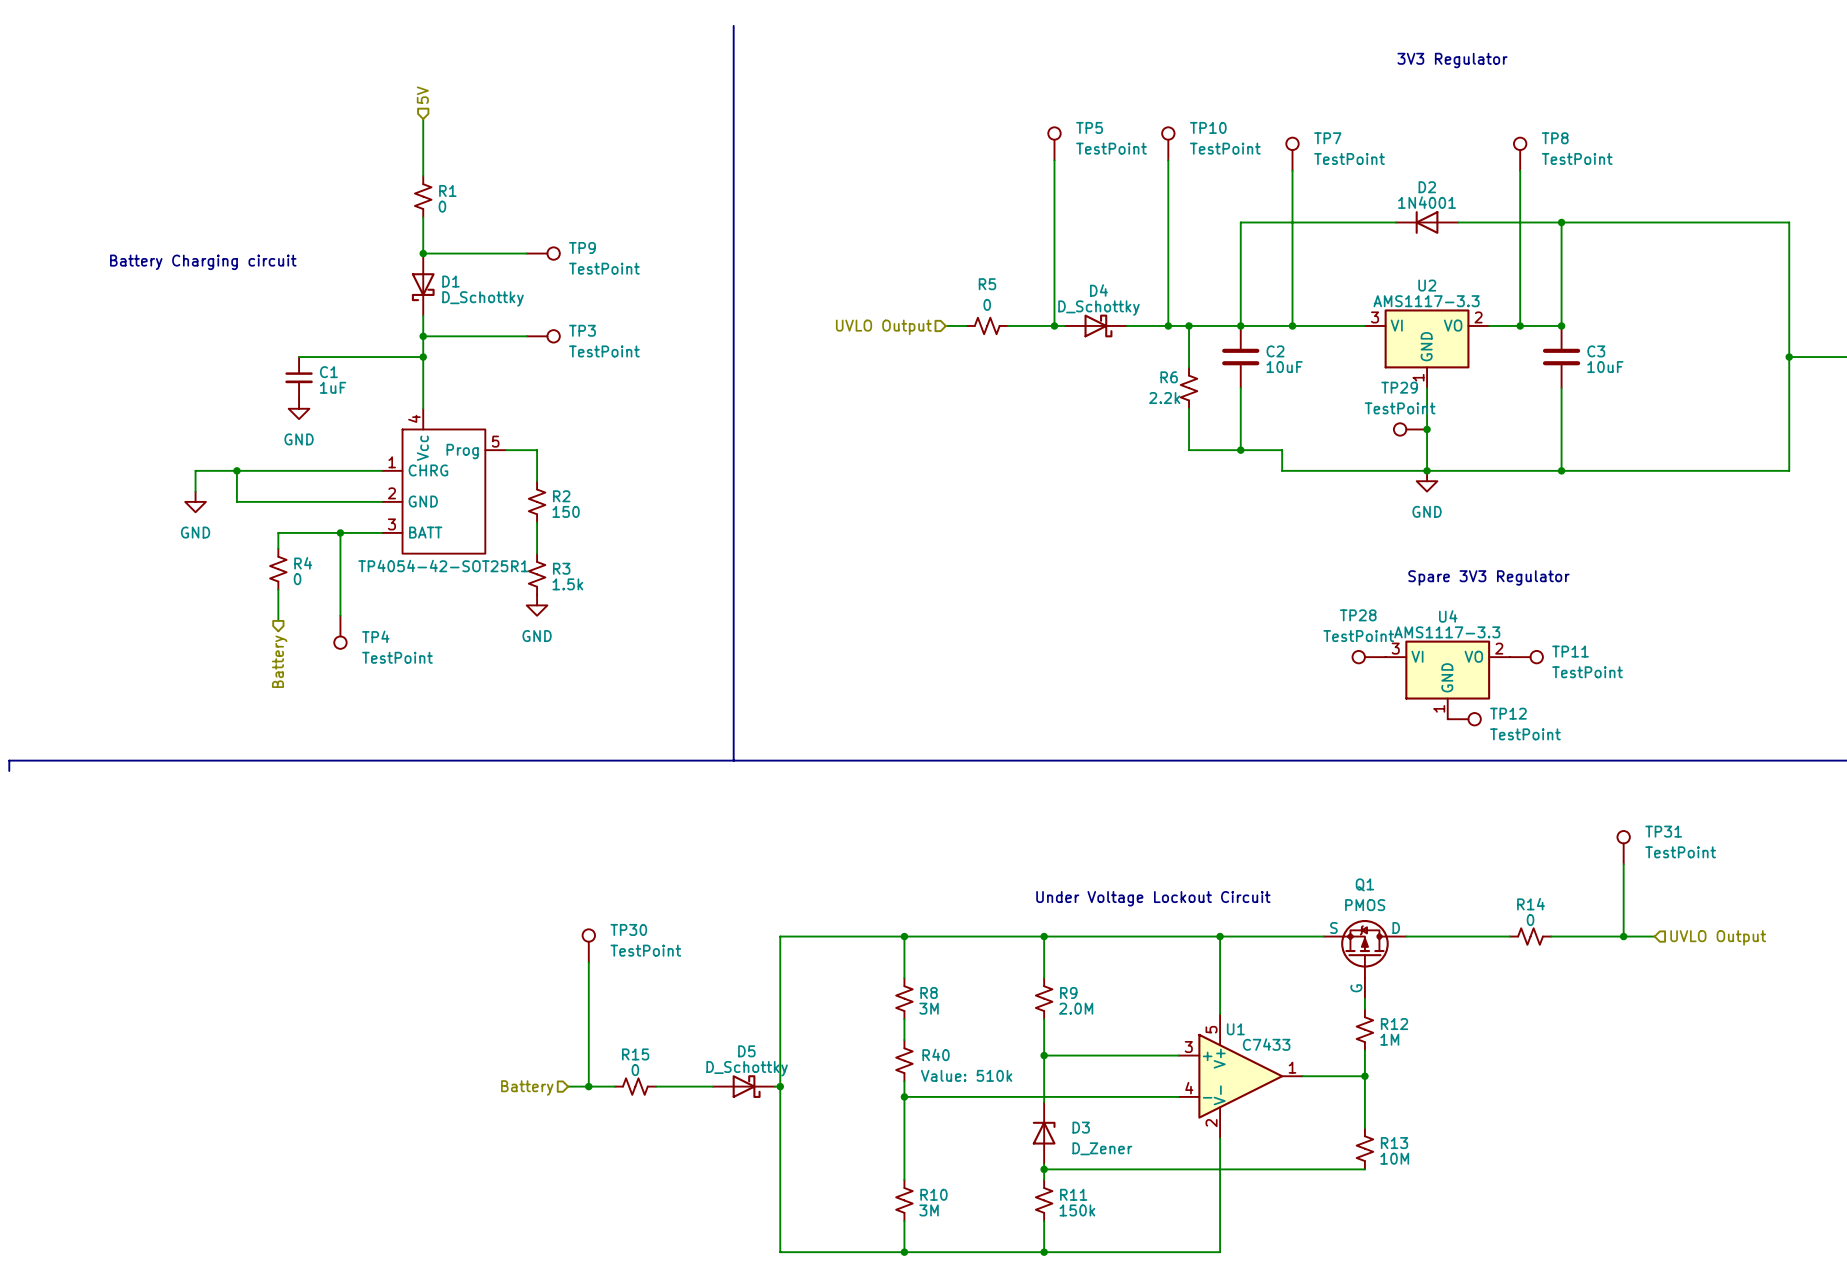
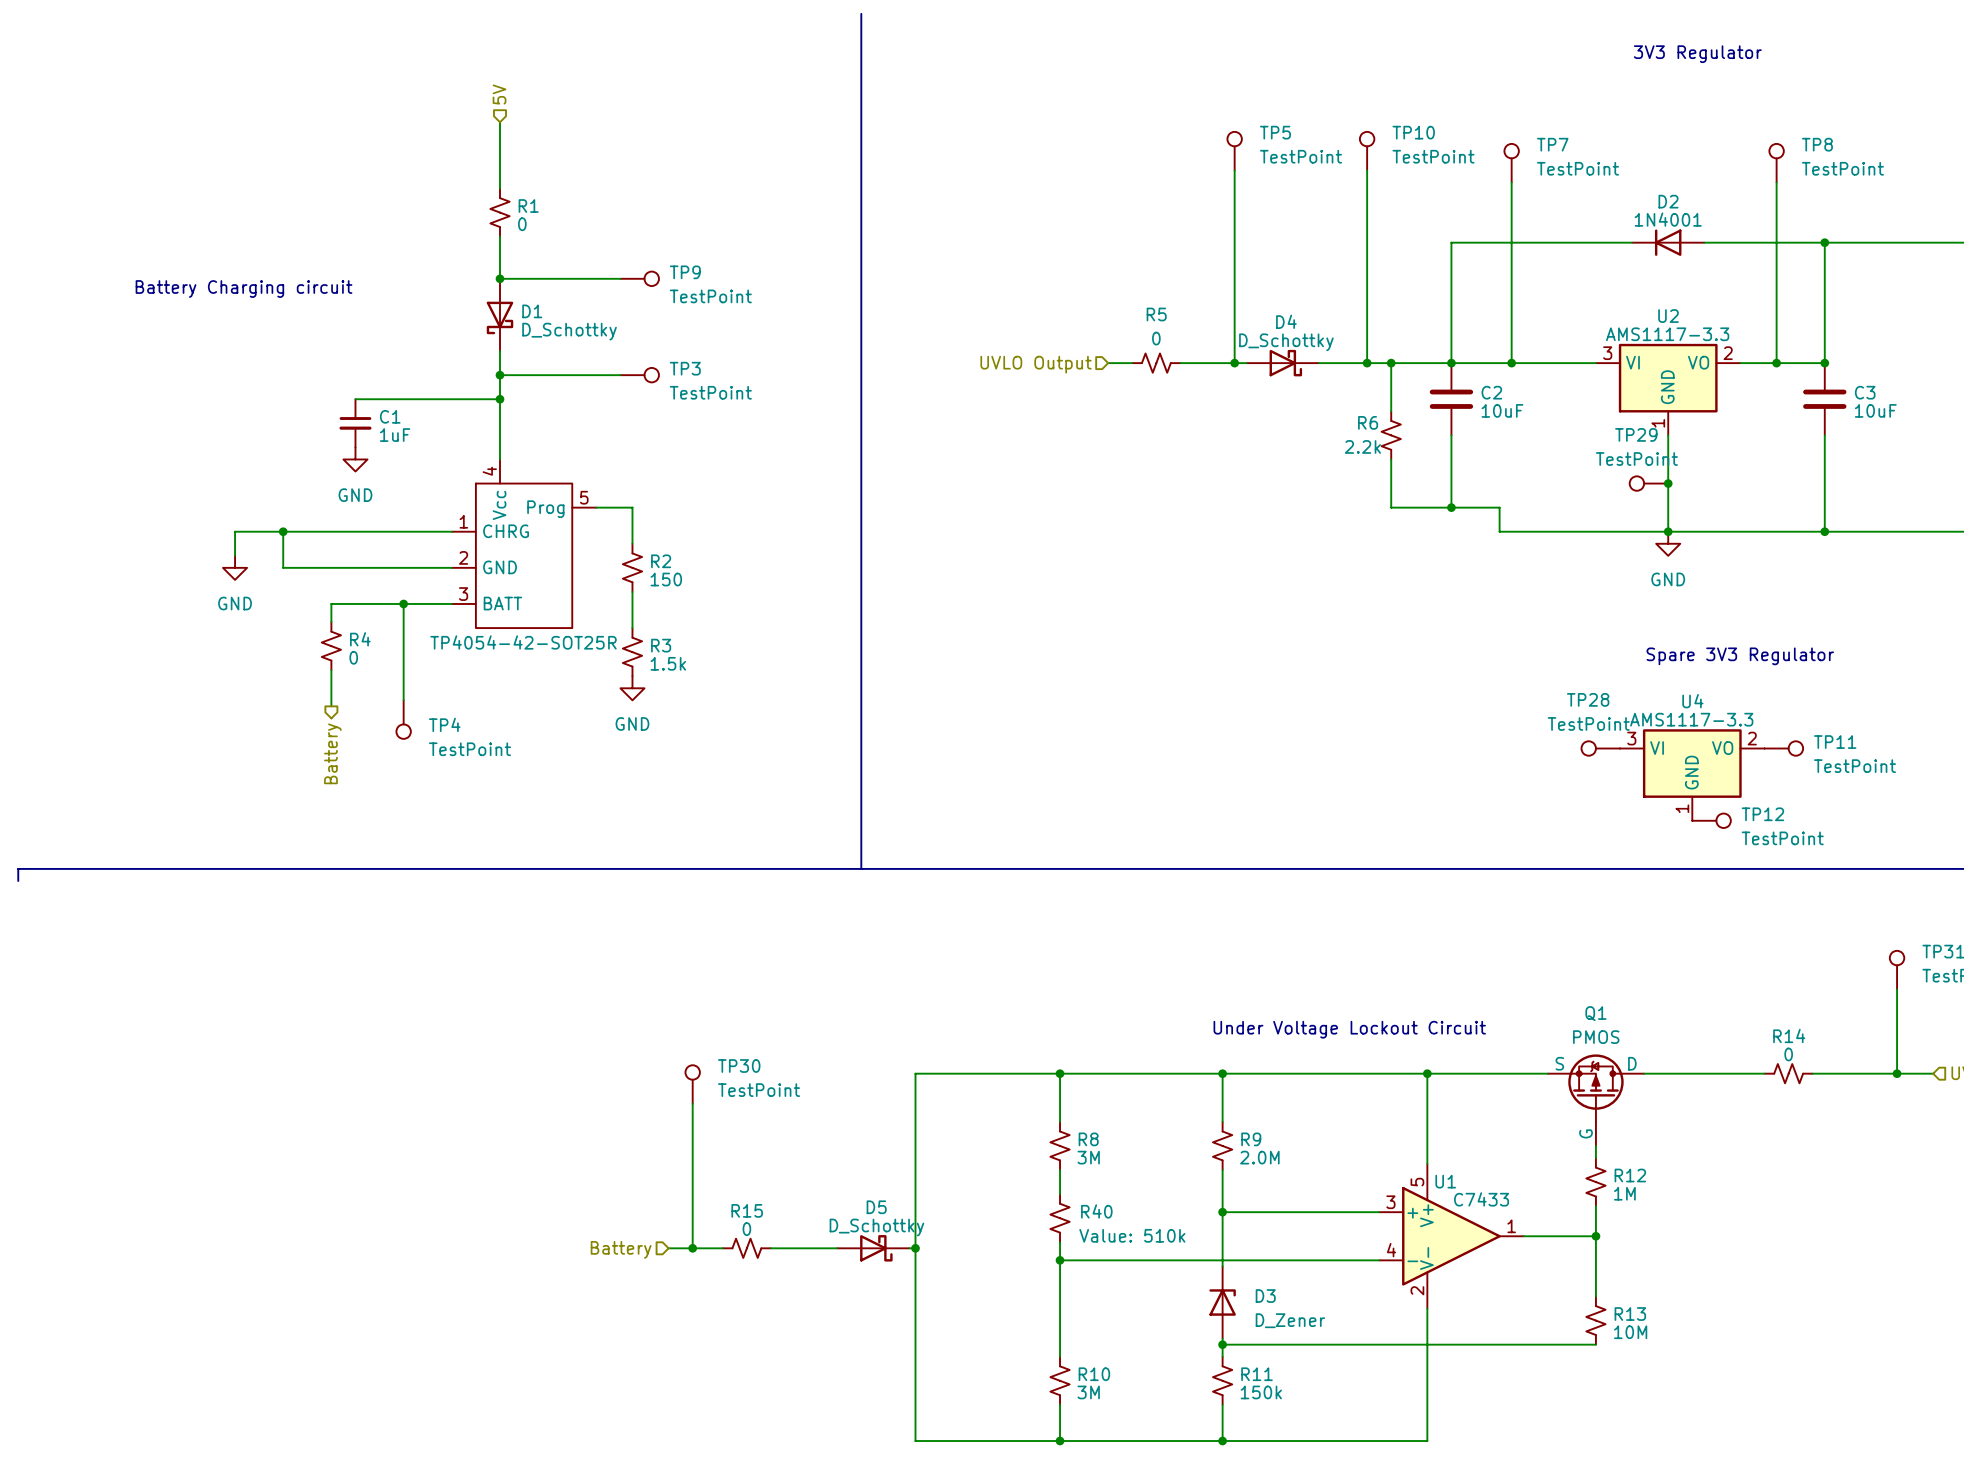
TP4054-42-SOT25R1 name: TP4054-42-SOT25R1 (443, 566) -> TP4054-42-SOT25R (523, 642)

